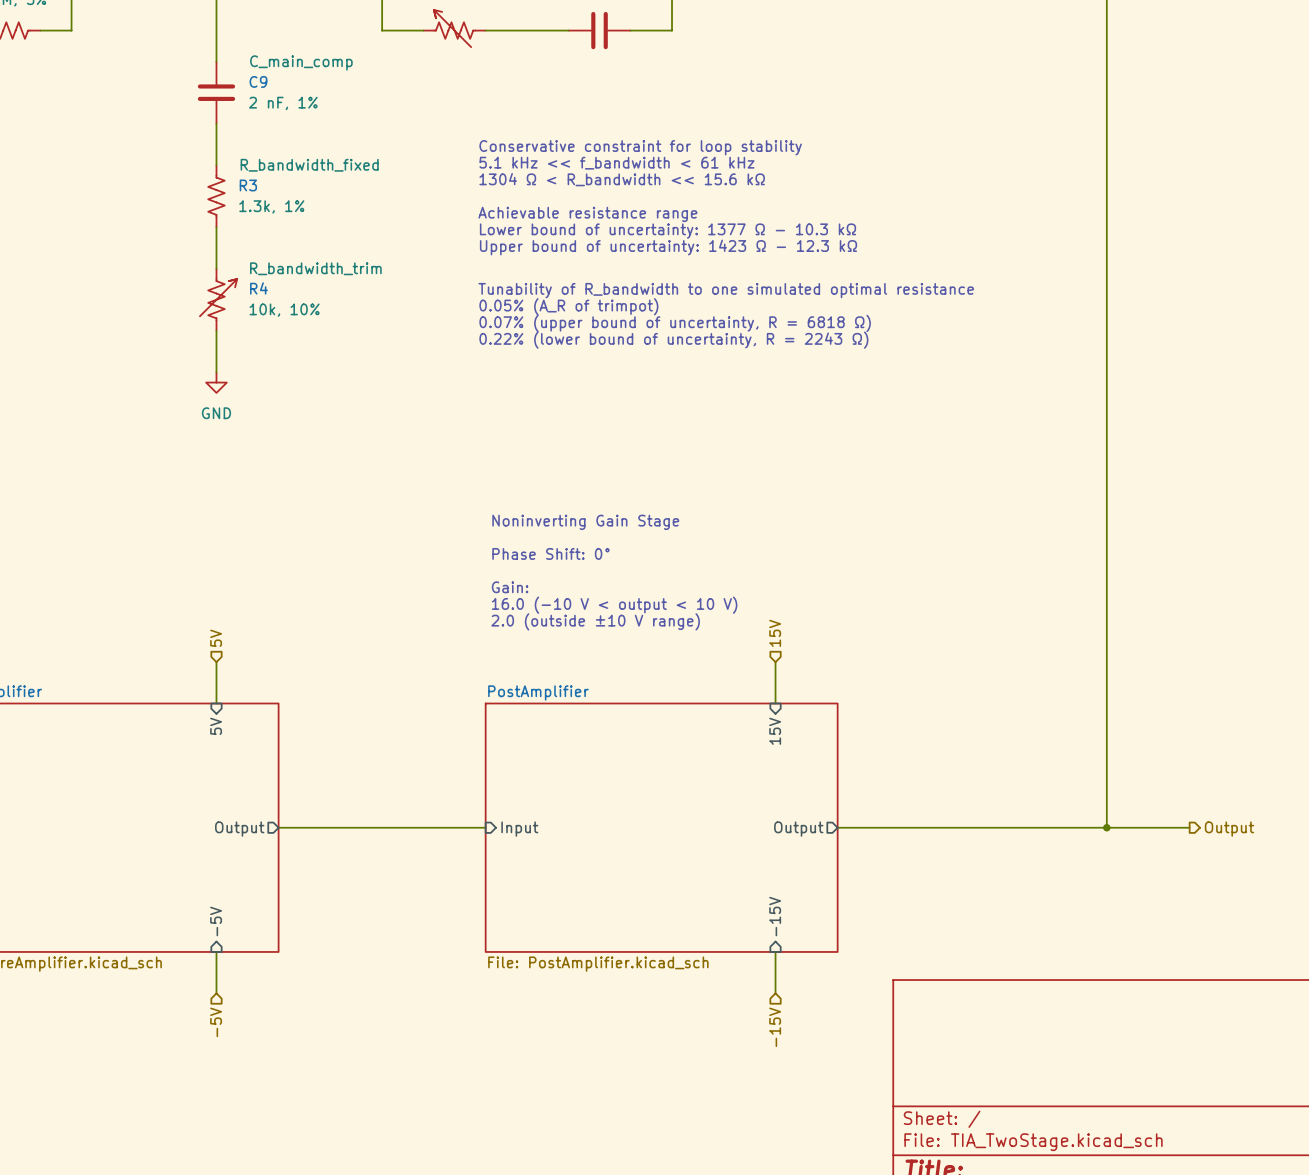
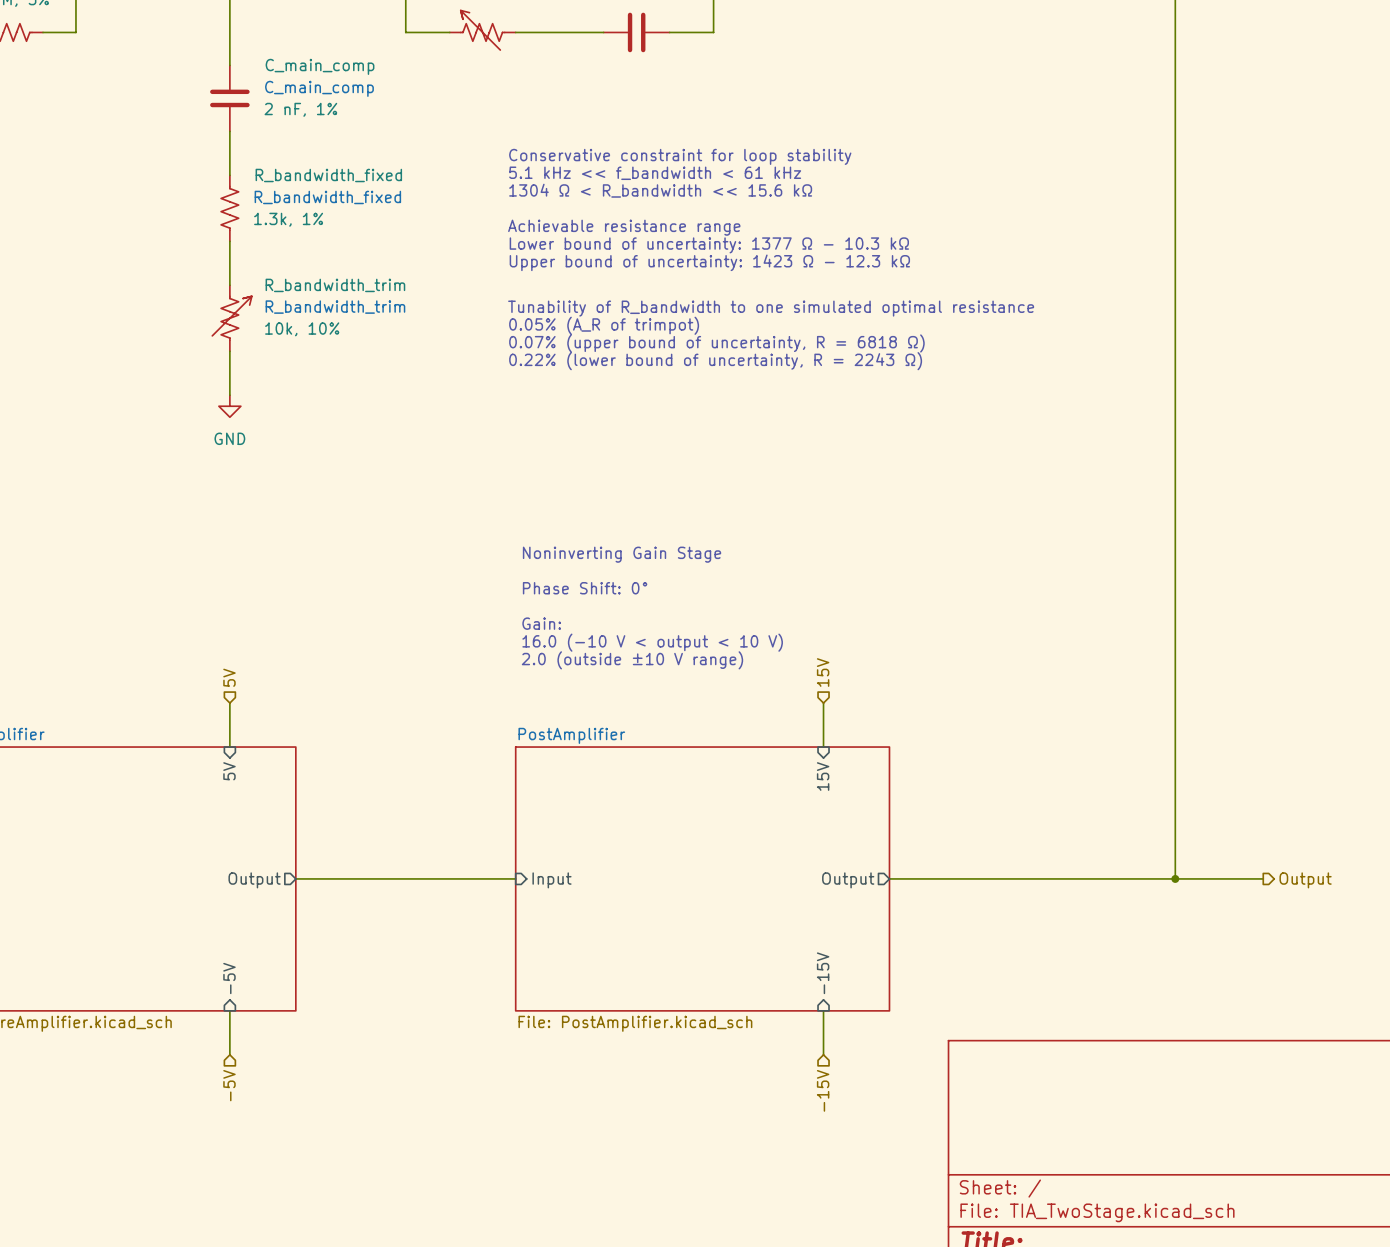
C9 name: C9 (258, 81) -> C_main_comp (319, 88)
R3 name: R3 (248, 185) -> R_bandwidth_fixed (327, 197)
R4 name: R4 (258, 288) -> R_bandwidth_trim (335, 307)

